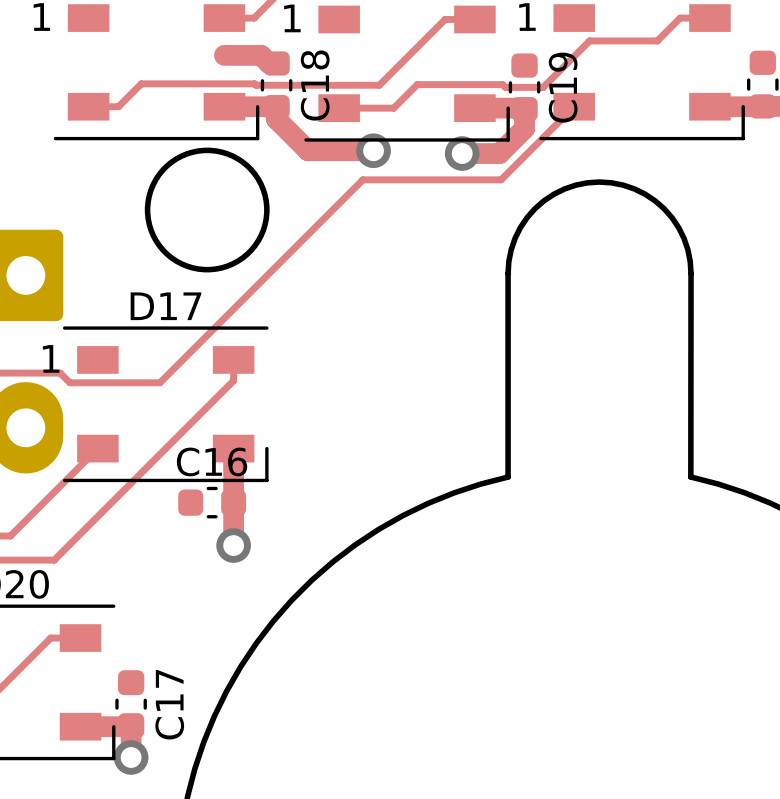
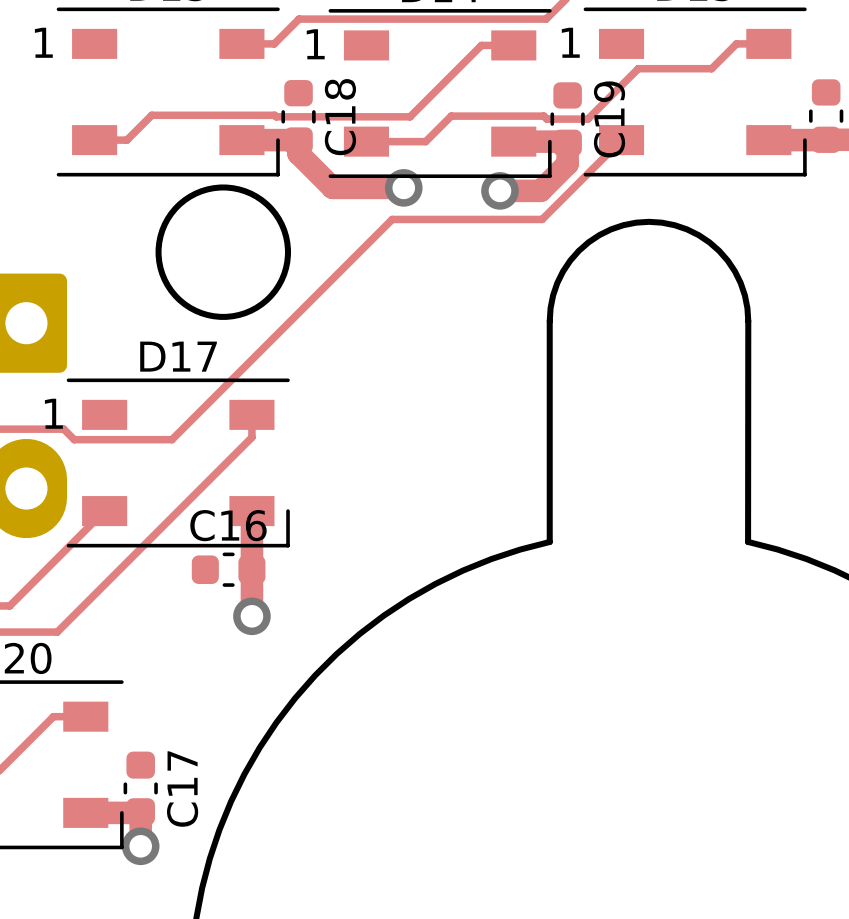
track: (224, 55) (261, 55) (269, 63) (276, 63) -> none

